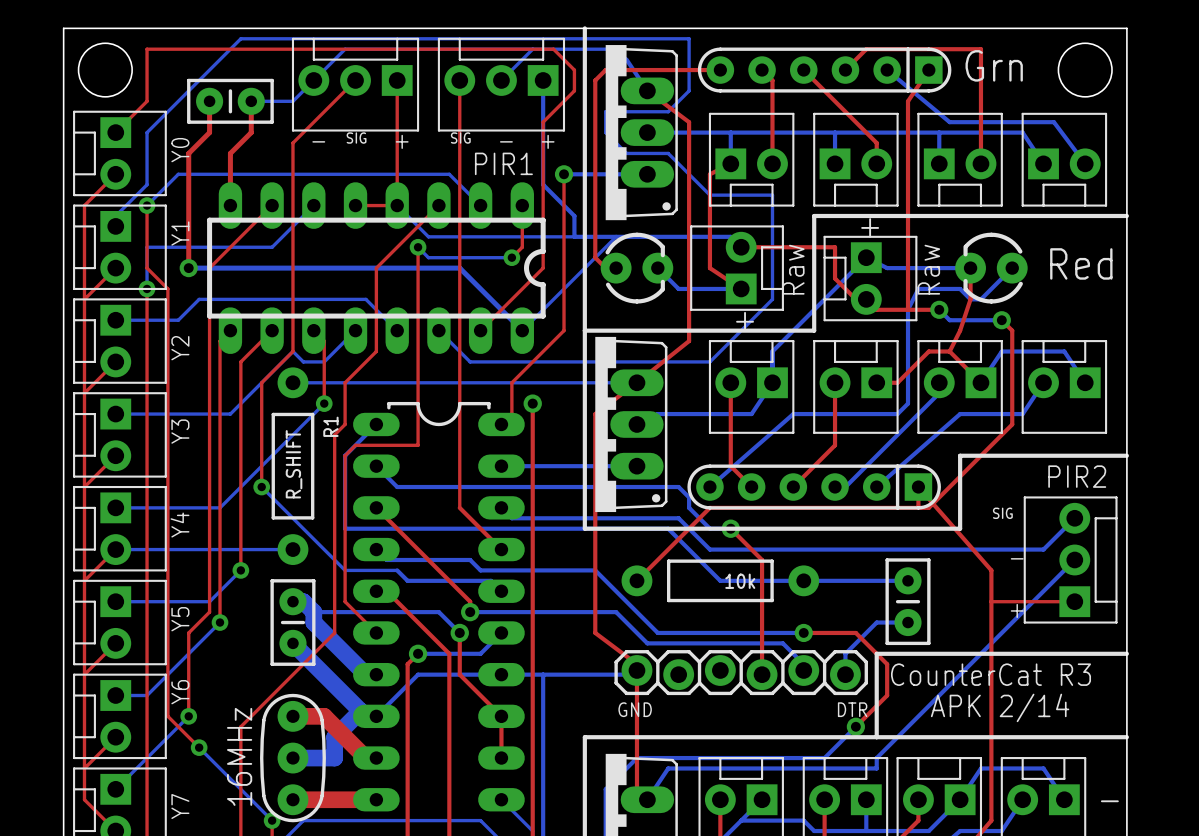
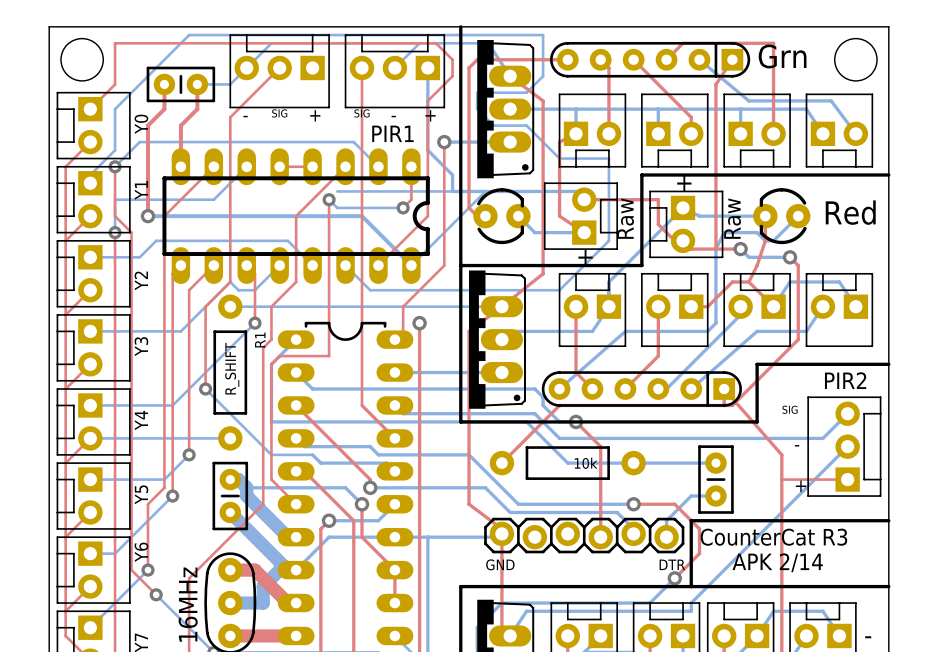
top track: (397, 80) (397, 205) -> none
bottom track: (397, 205) (428, 236) -> none

